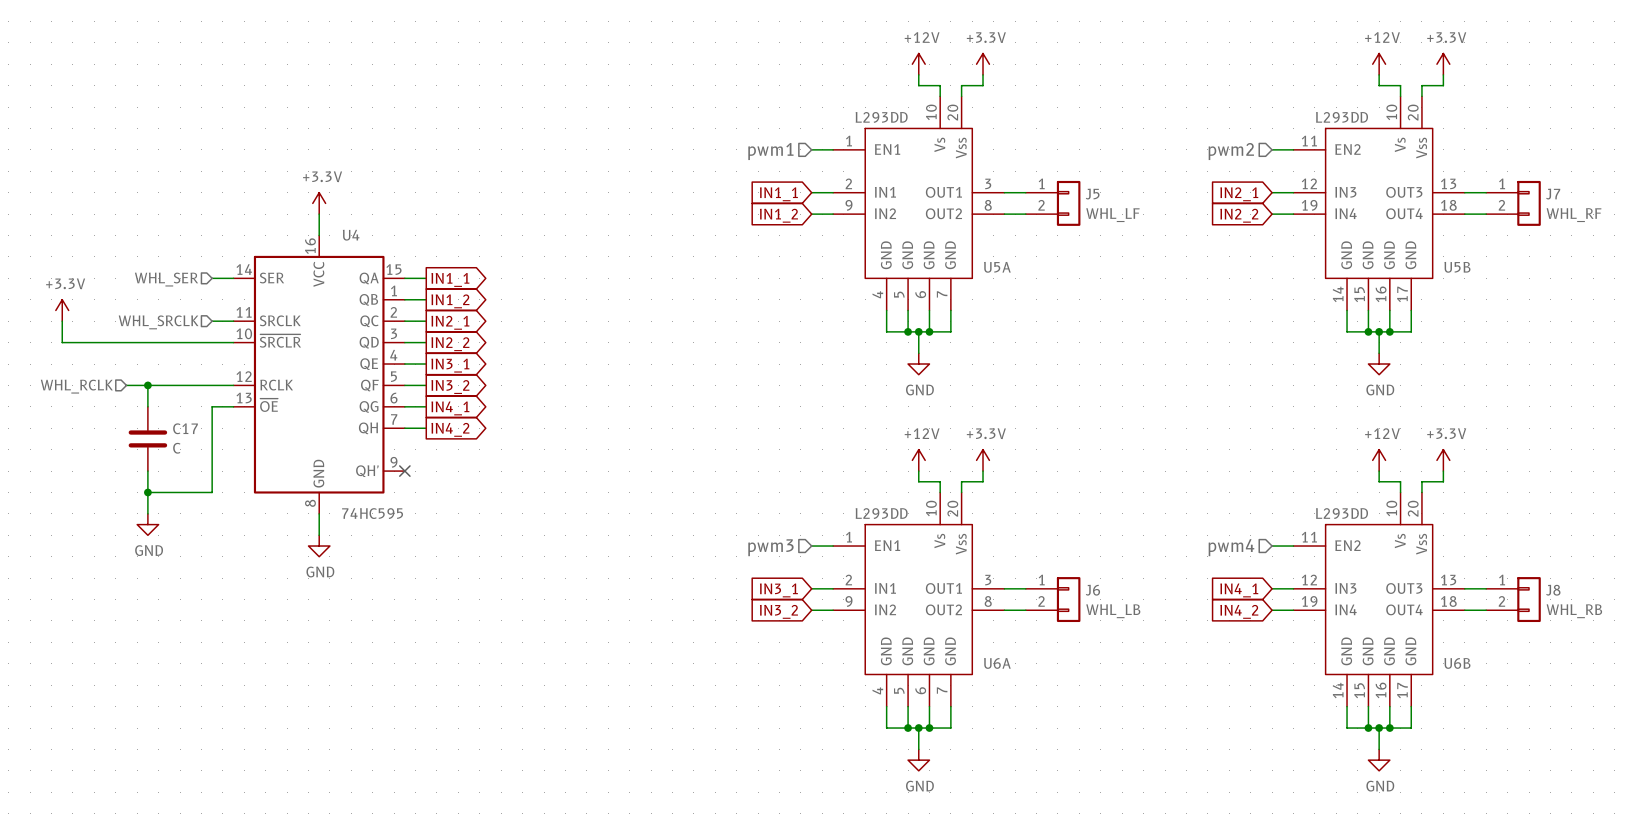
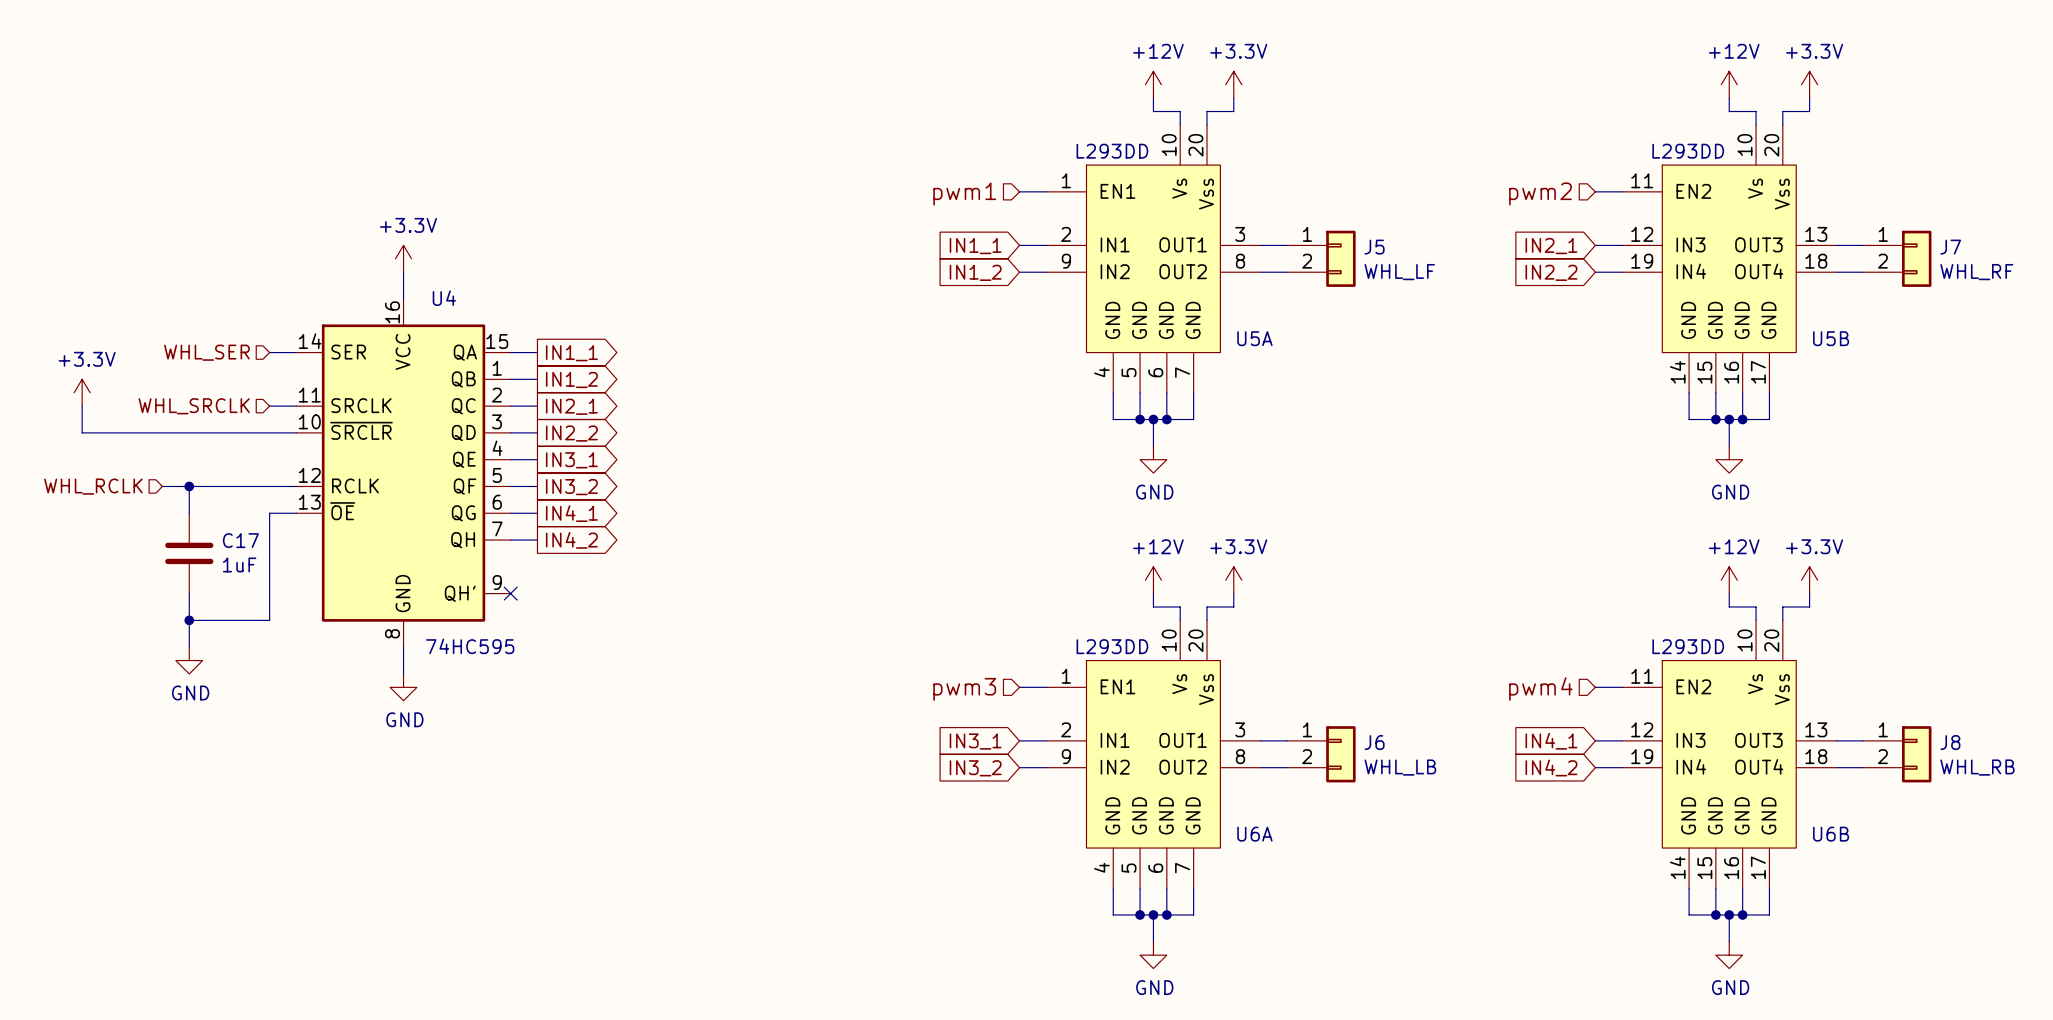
C17 value: C (176, 448) -> 1uF (239, 564)

